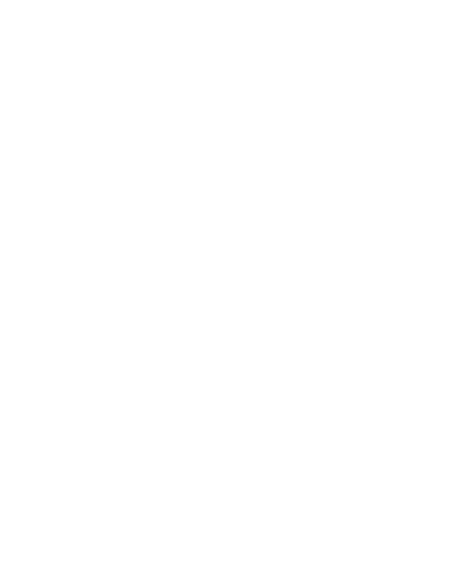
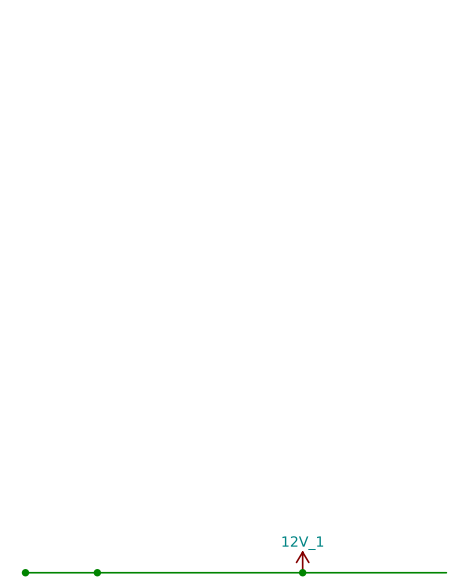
power symbol: none -> 12V_1 (302, 562)
wire: none -> (25, 572) (446, 572)
junction: none -> (25, 572)
junction: none -> (97, 572)
junction: none -> (302, 572)

